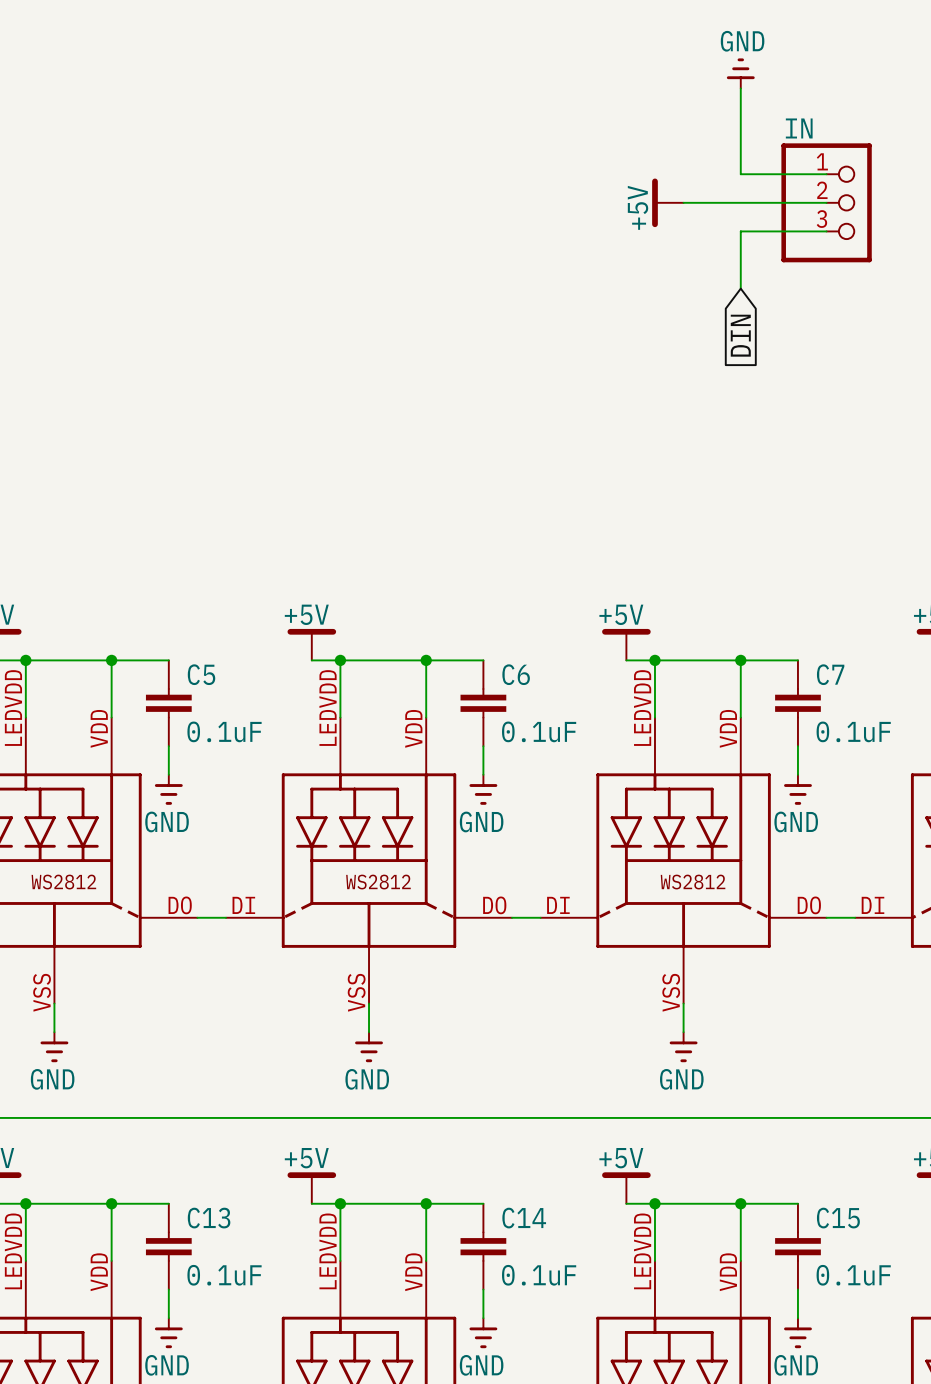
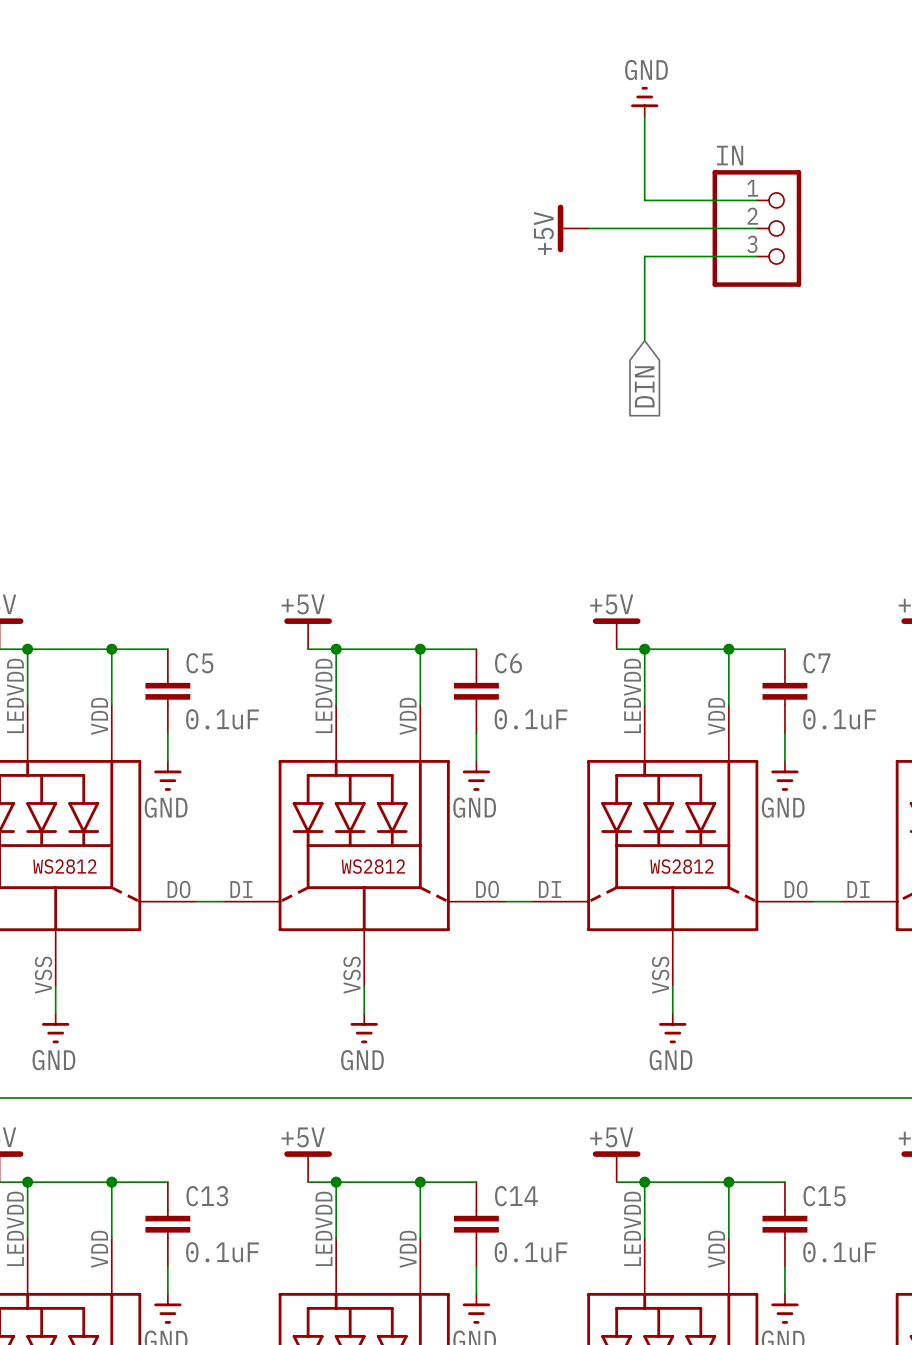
power symbol position: GND (740, 73) -> GND (644, 101)
wire: (740, 88) (740, 174) (826, 174) -> none
wire: none -> (644, 116) (644, 200) (672, 200)
power symbol position: +5V (667, 202) -> +5V (573, 228)
wire: (769, 202) (826, 202) -> none
IN position: (826, 202) -> (756, 228)
wire: (740, 231) (740, 288) -> (728, 228) (588, 228)
wire: (769, 231) (826, 231) -> none
wire: none -> (756, 256) (644, 256) (644, 340)
global label position: DIN (740, 335) -> DIN (644, 386)

